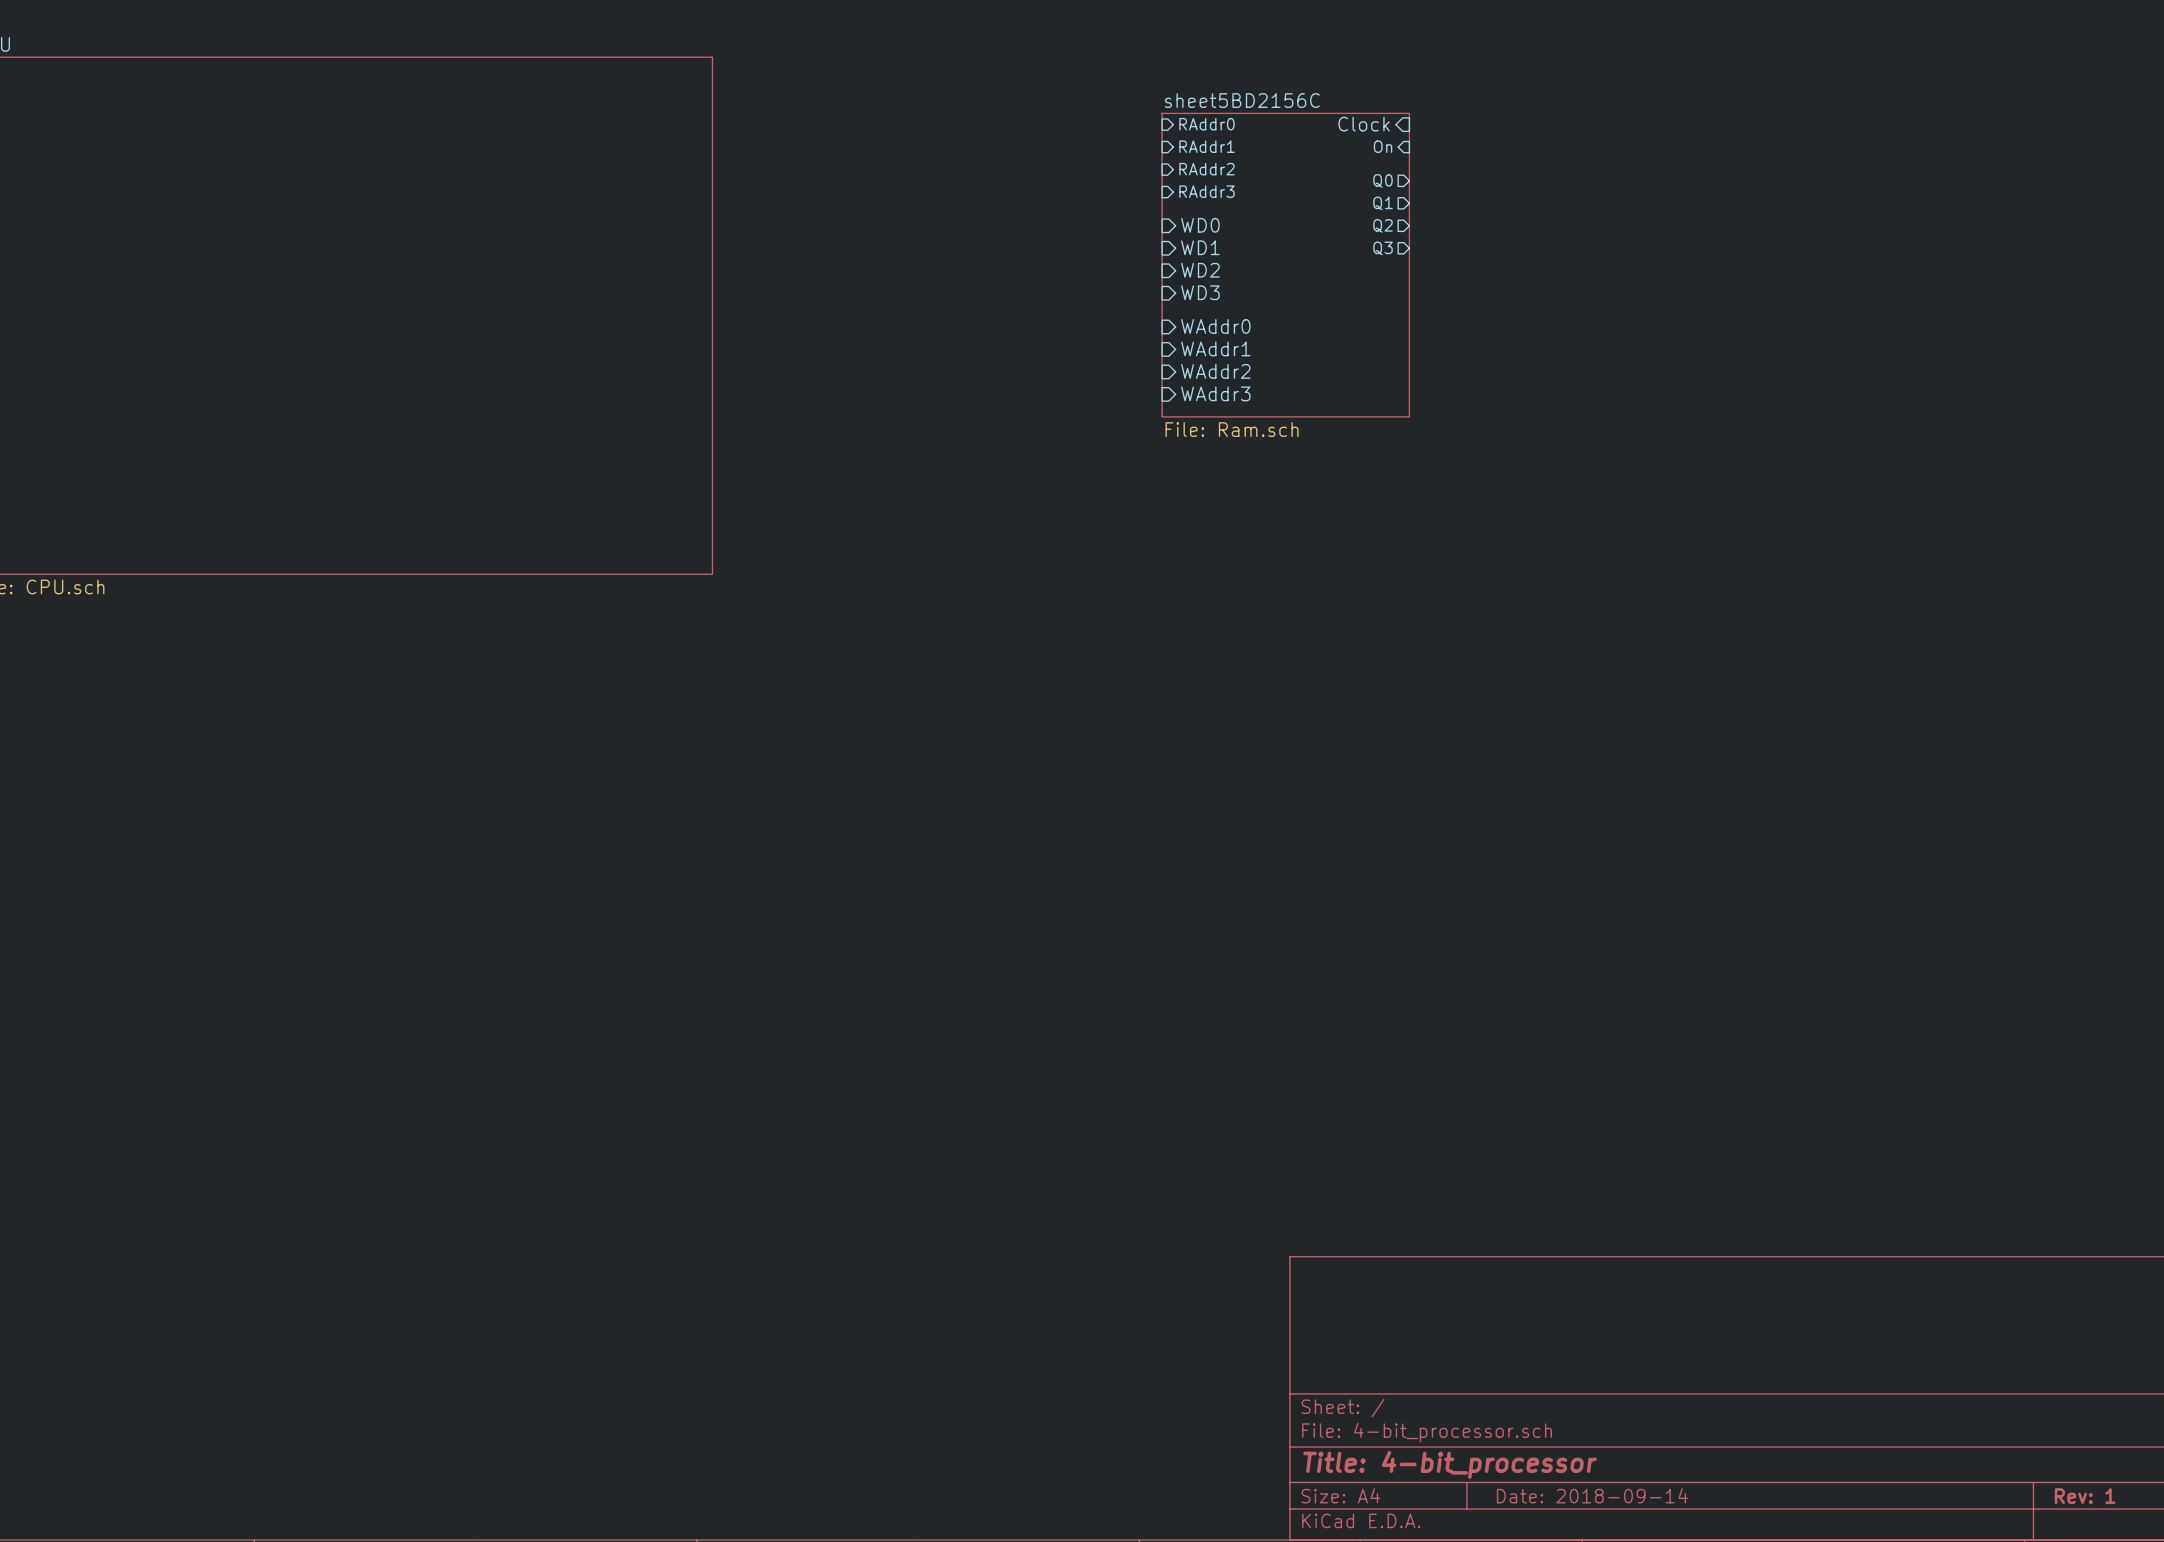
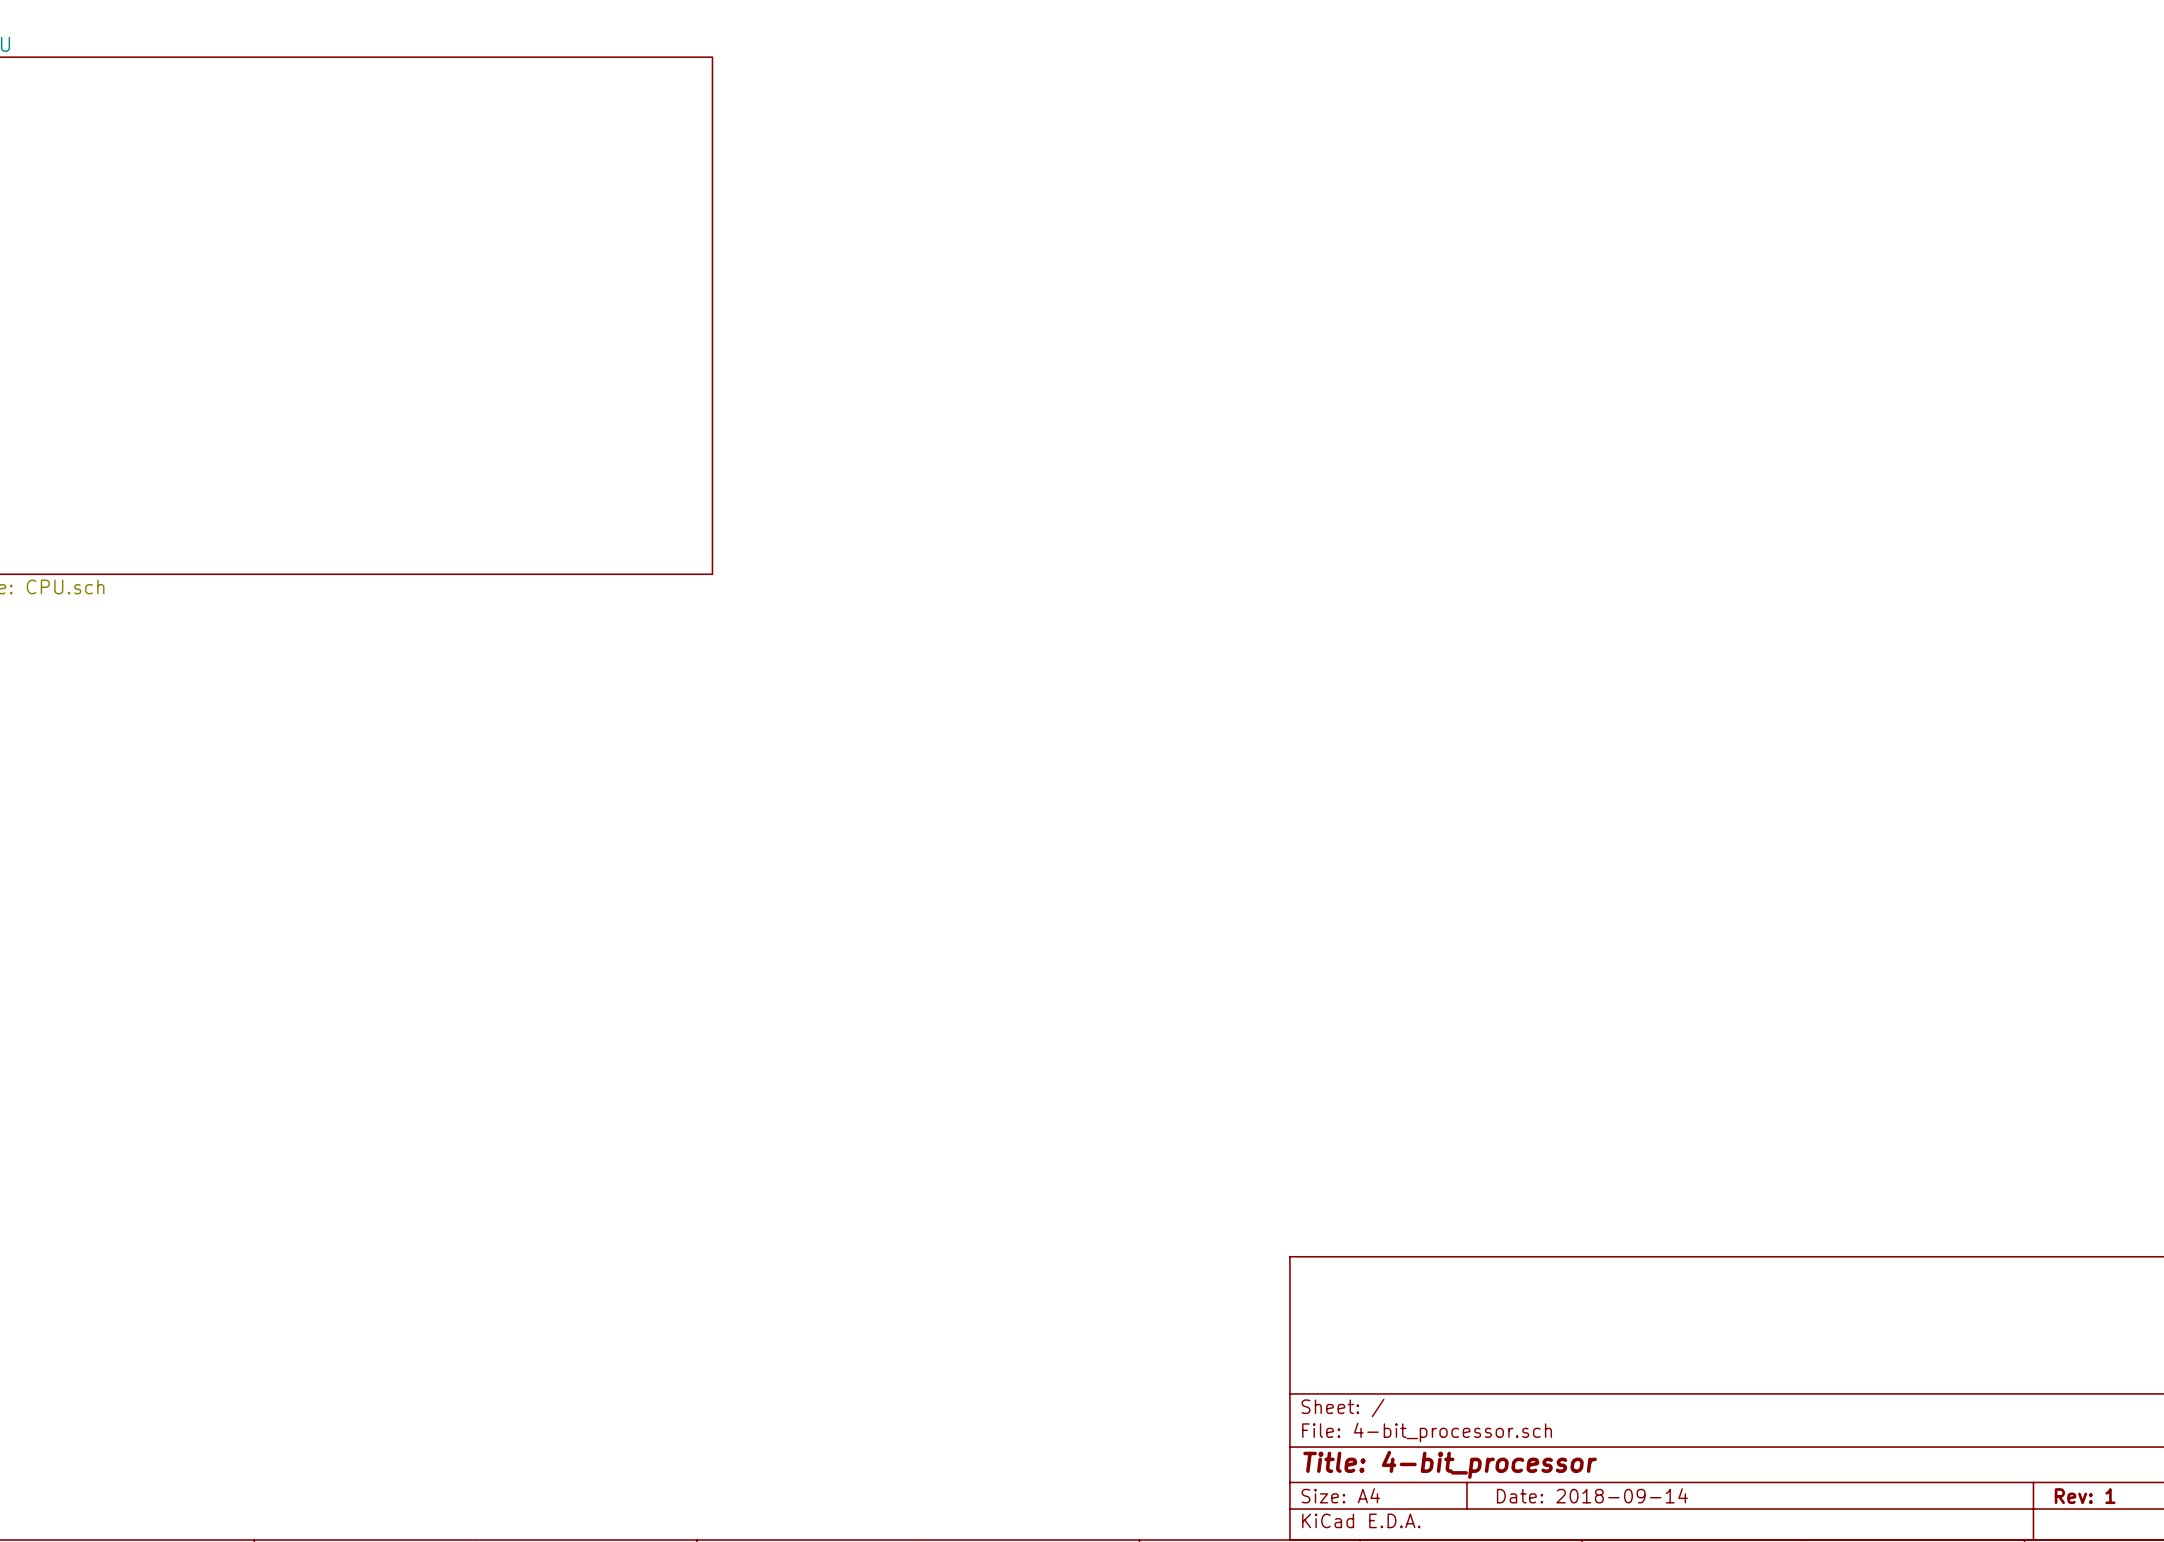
sheet pin: RAddr0 (1206, 124) -> none
sheet pin: Clock (1364, 124) -> none
sheet pin: RAddr1 (1206, 146) -> none
sheet pin: On (1383, 146) -> none
sheet pin: RAddr2 (1206, 169) -> none
sheet pin: Q0 (1383, 180) -> none
sheet pin: RAddr3 (1206, 191) -> none
sheet pin: Q1 (1383, 203) -> none
sheet pin: WD0 (1200, 225) -> none
sheet pin: Q2 (1383, 225) -> none
sheet pin: WD1 (1200, 247) -> none
sheet pin: Q3 (1383, 248) -> none
sheet sheet5BD2156C: File: Ram.sch (1285, 265) -> none
sheet pin: WD2 (1200, 270) -> none
sheet pin: WD3 (1200, 292) -> none
sheet pin: WAddr0 (1215, 326) -> none
sheet pin: WAddr1 (1215, 348) -> none
sheet pin: WAddr2 (1215, 371) -> none
sheet pin: WAddr3 (1215, 393) -> none

